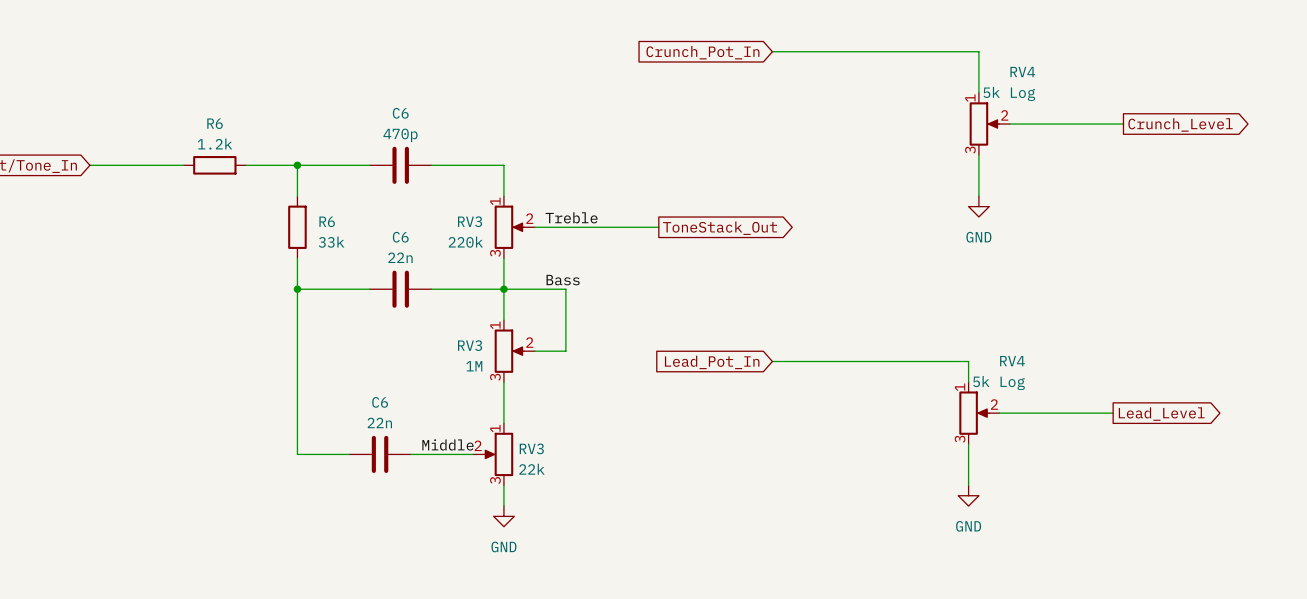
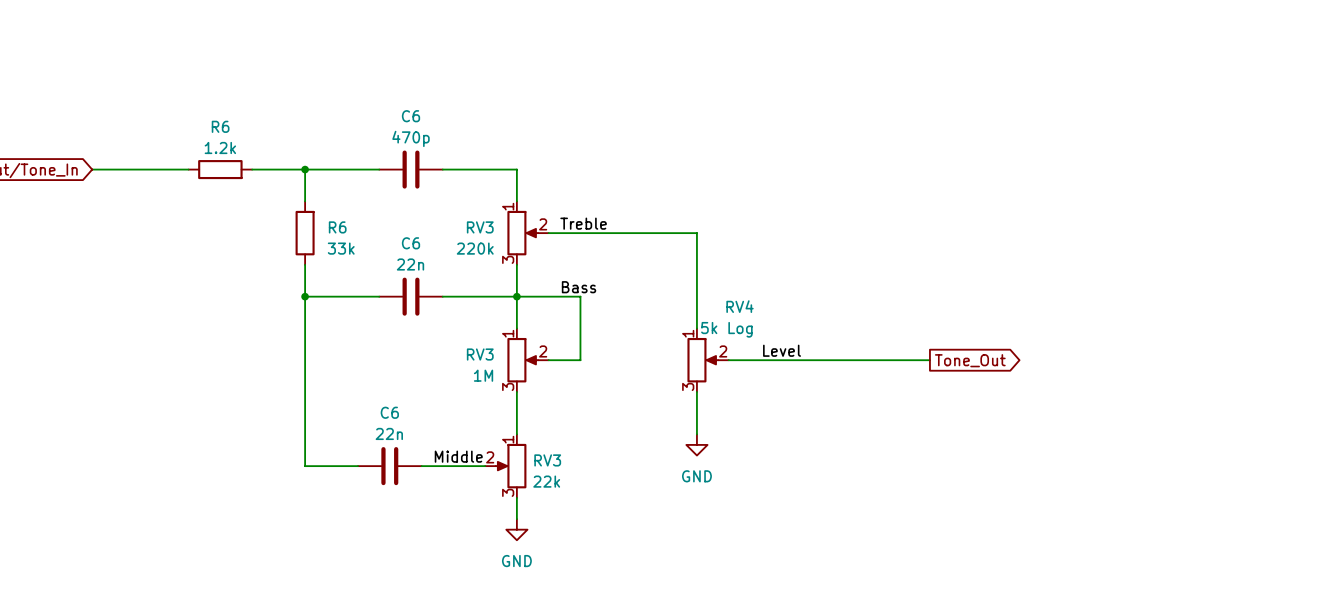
wire: (772, 51) (978, 51) (978, 93) -> none
global label: Crunch_Pot_In (702, 52) -> none
RV4: 5k Log (989, 124) -> none
wire: (1009, 124) (1123, 124) -> none
global label: Crunch_Level (1180, 124) -> none
wire: (978, 154) (978, 196) -> none
power symbol: GND (978, 206) -> none
wire: none -> (675, 233) (696, 233) (696, 328)
global label: ToneStack_Out (720, 228) -> none
label: none -> Level (782, 350)
RV4: none -> 5k Log (708, 360)
wire: none -> (728, 360) (929, 360)
global label: none -> Tone_Out (970, 360)
wire: (772, 361) (968, 361) (968, 382) -> none
global label: Lead_Pot_In (712, 362) -> none
wire: none -> (696, 391) (696, 434)
RV4: 5k Log (979, 413) -> none
wire: (999, 413) (1113, 413) -> none
global label: Lead_Level (1161, 414) -> none
power symbol: none -> GND (696, 444)
wire: (968, 444) (968, 485) -> none
power symbol: GND (968, 495) -> none

